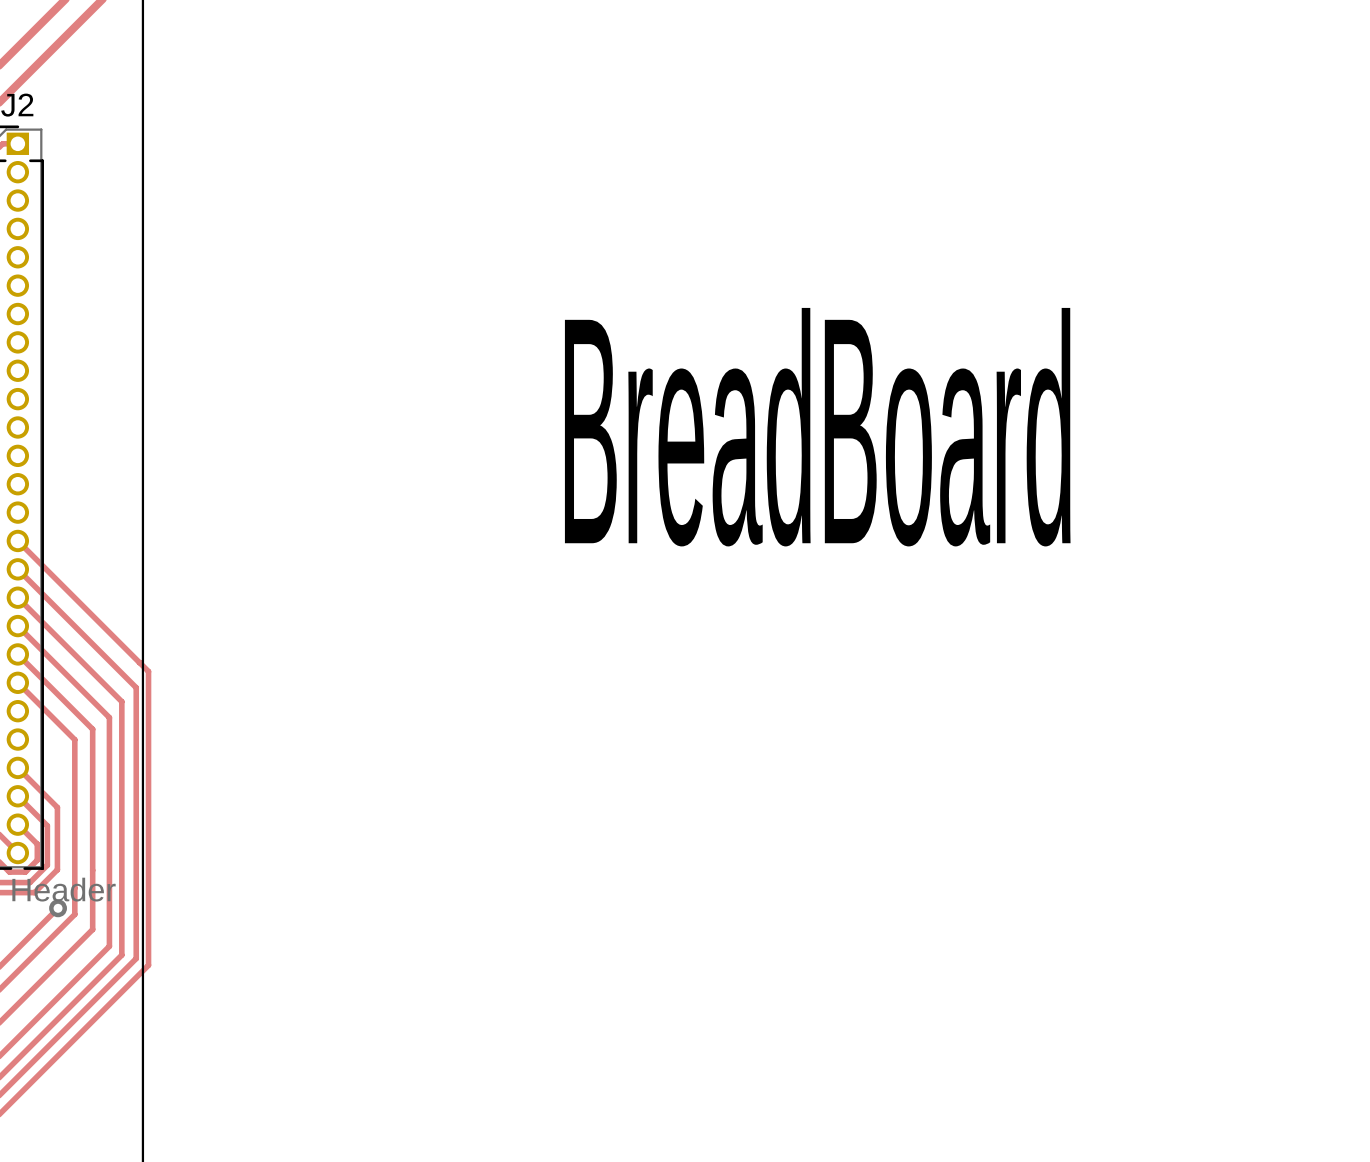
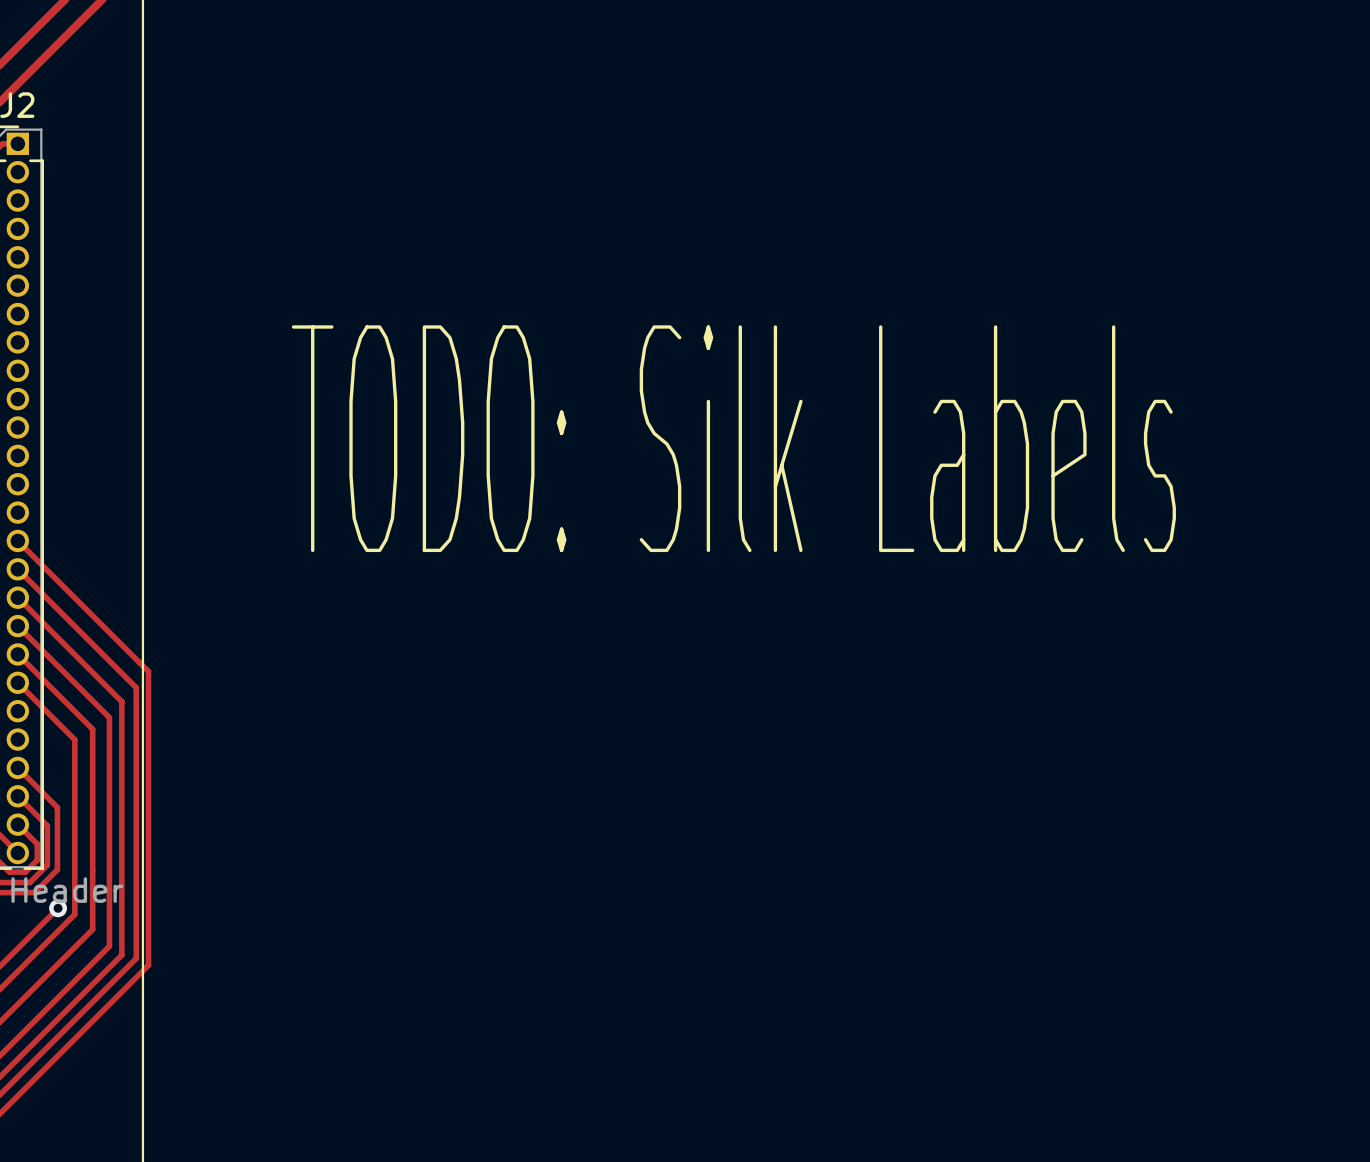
text: BreadBoard (817, 427) -> none
text: none -> TODO: Silk Labels (733, 438)

